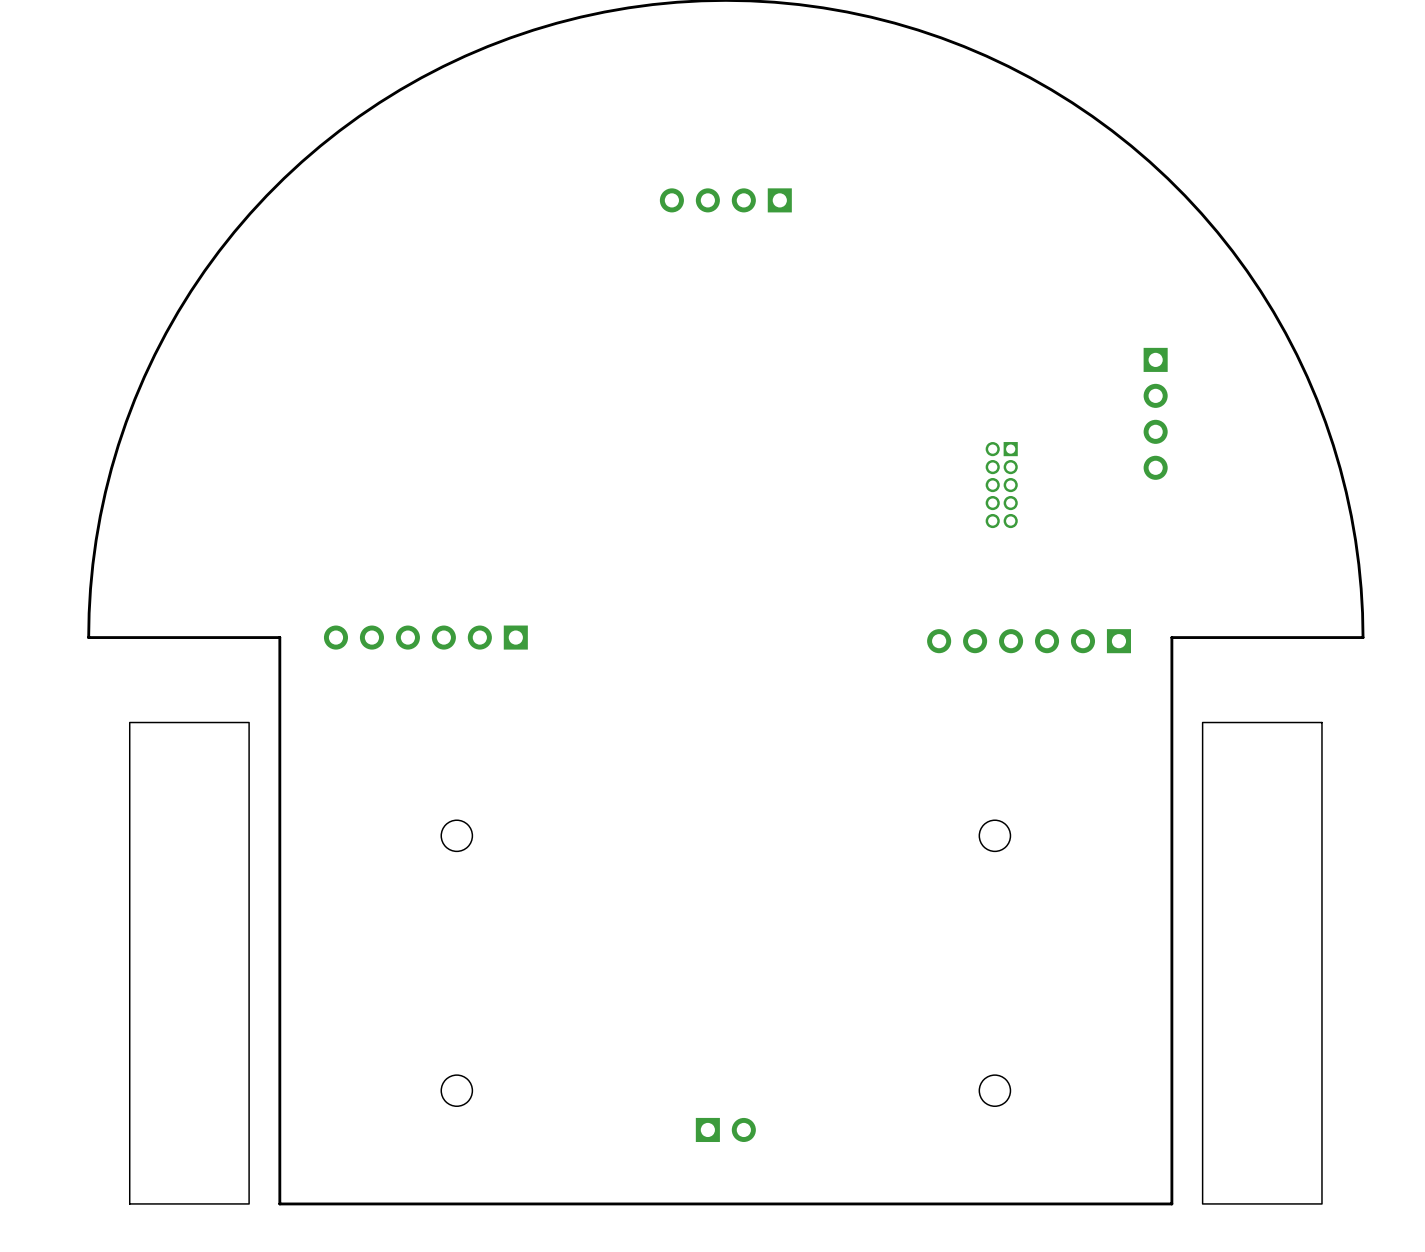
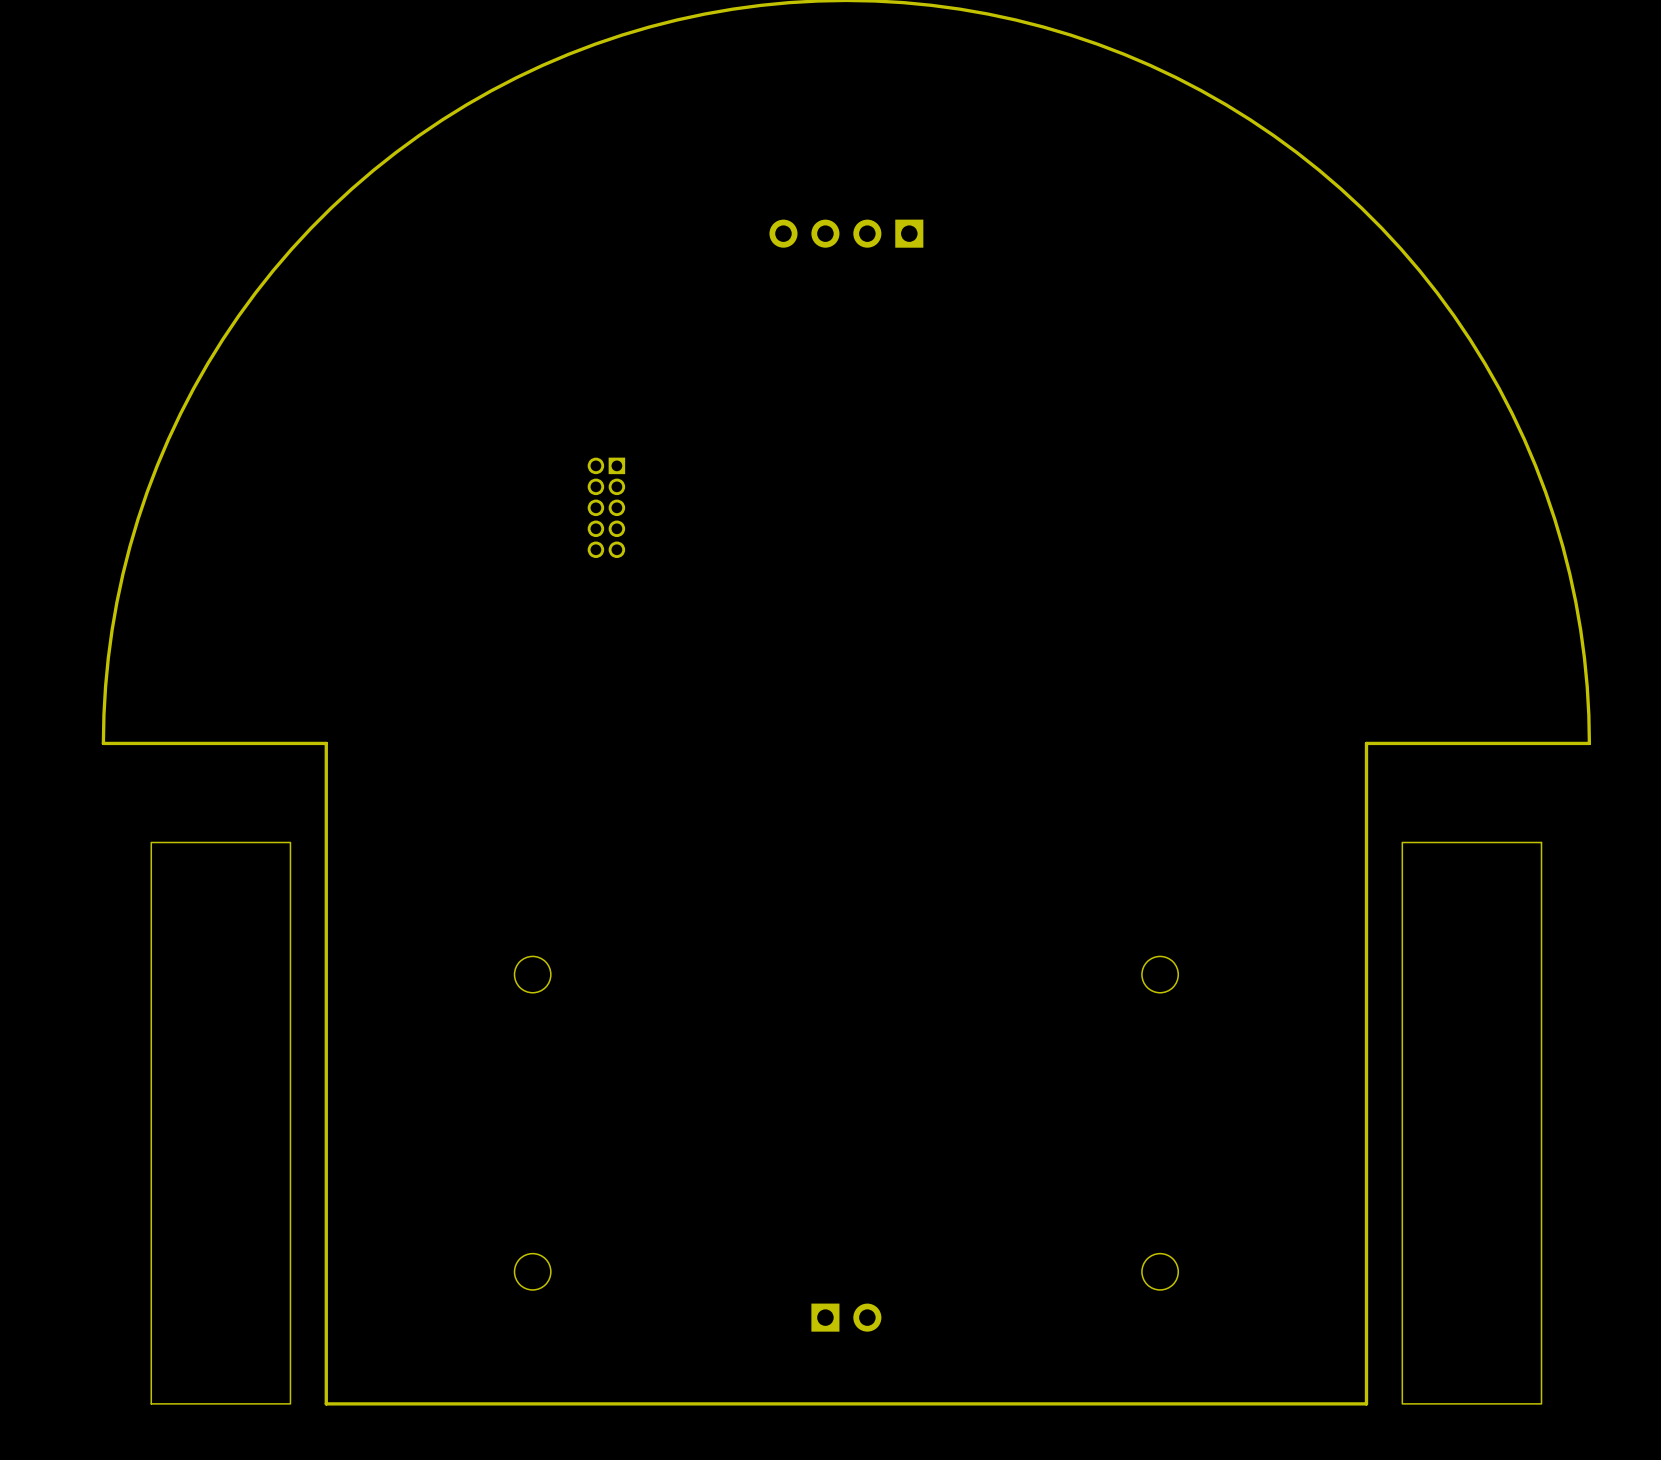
part: (1155, 413) -> none
part: none -> (606, 507)
part: (1001, 485) -> none
part: (425, 637) -> none
part: (1029, 641) -> none

